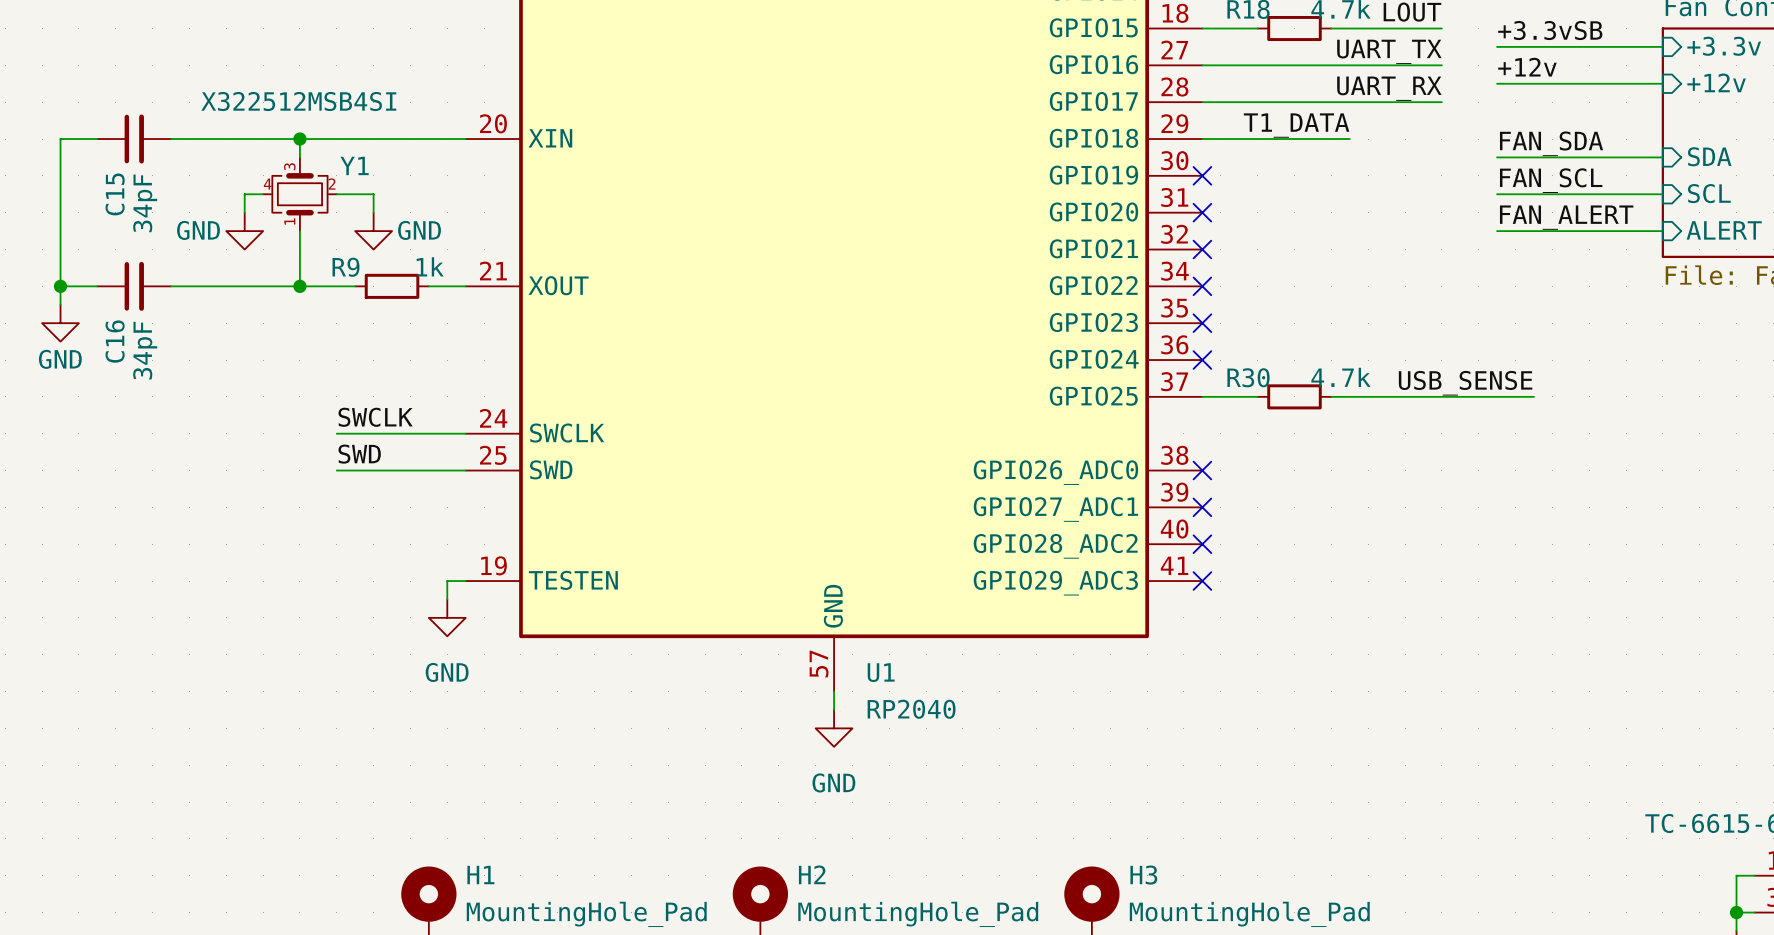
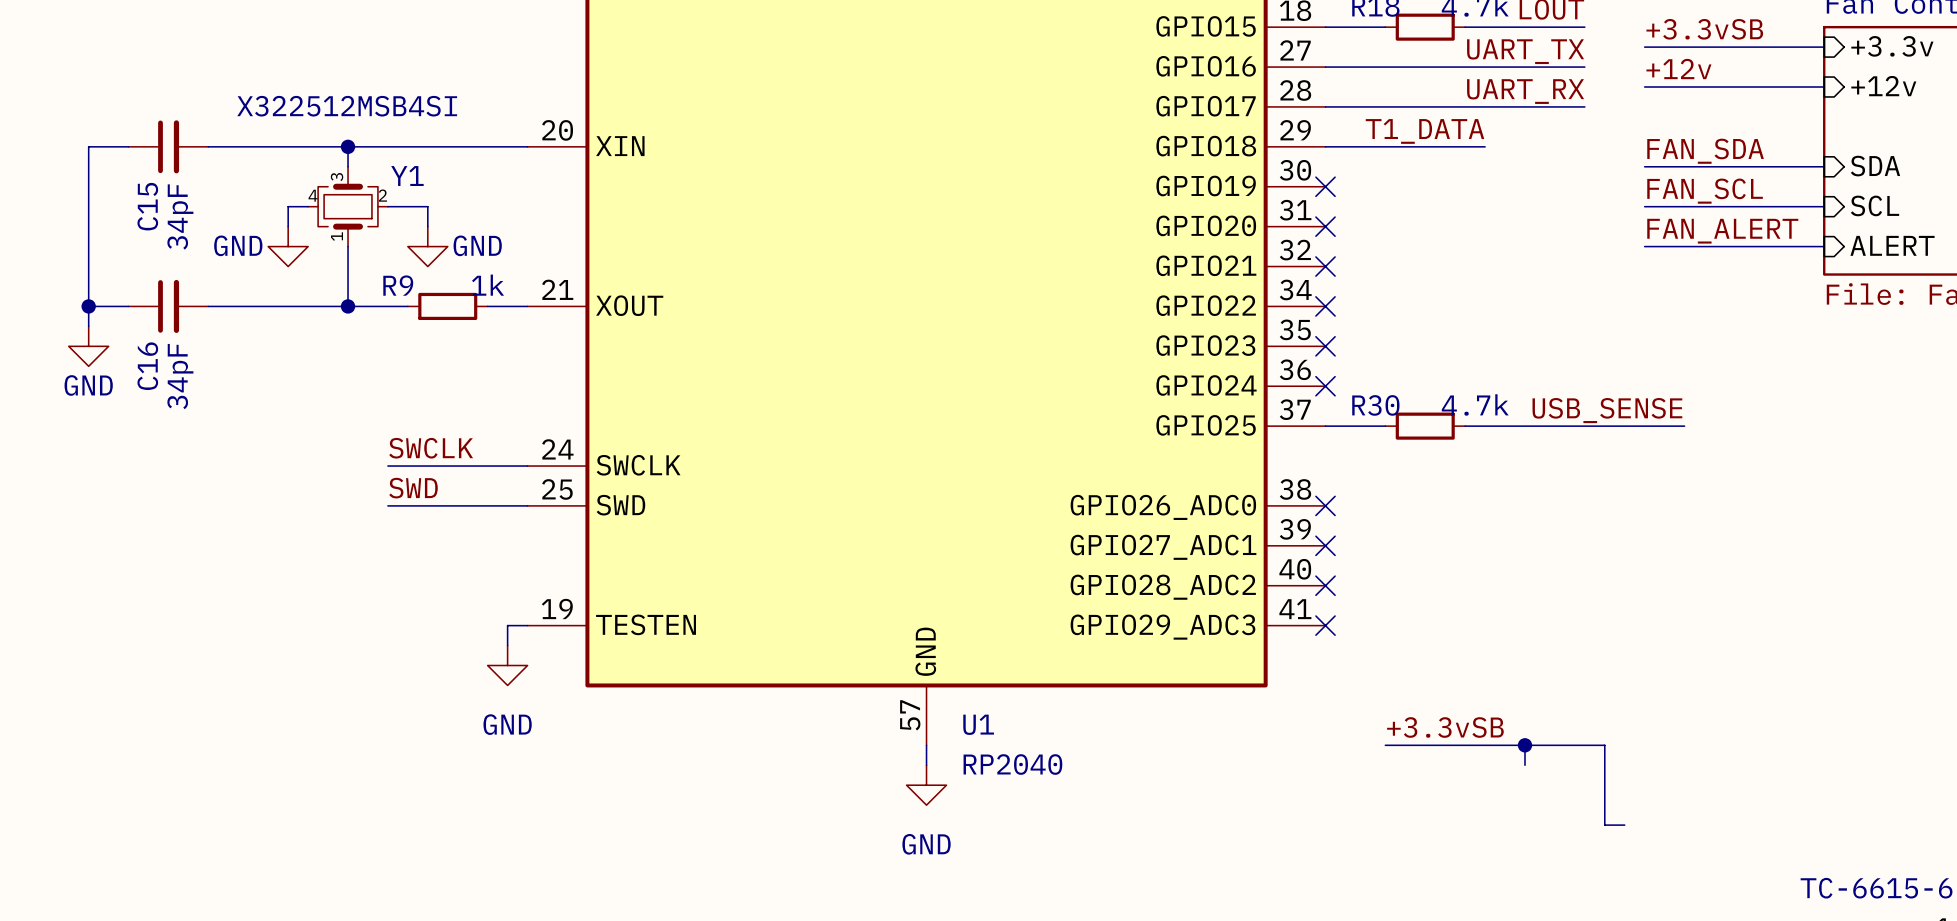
label: none -> +3.3vSB (1445, 727)
wire: none -> (1385, 745) (1604, 745) (1604, 825) (1624, 825)
wire: none -> (1524, 745) (1524, 765)
junction: none -> (1524, 745)

